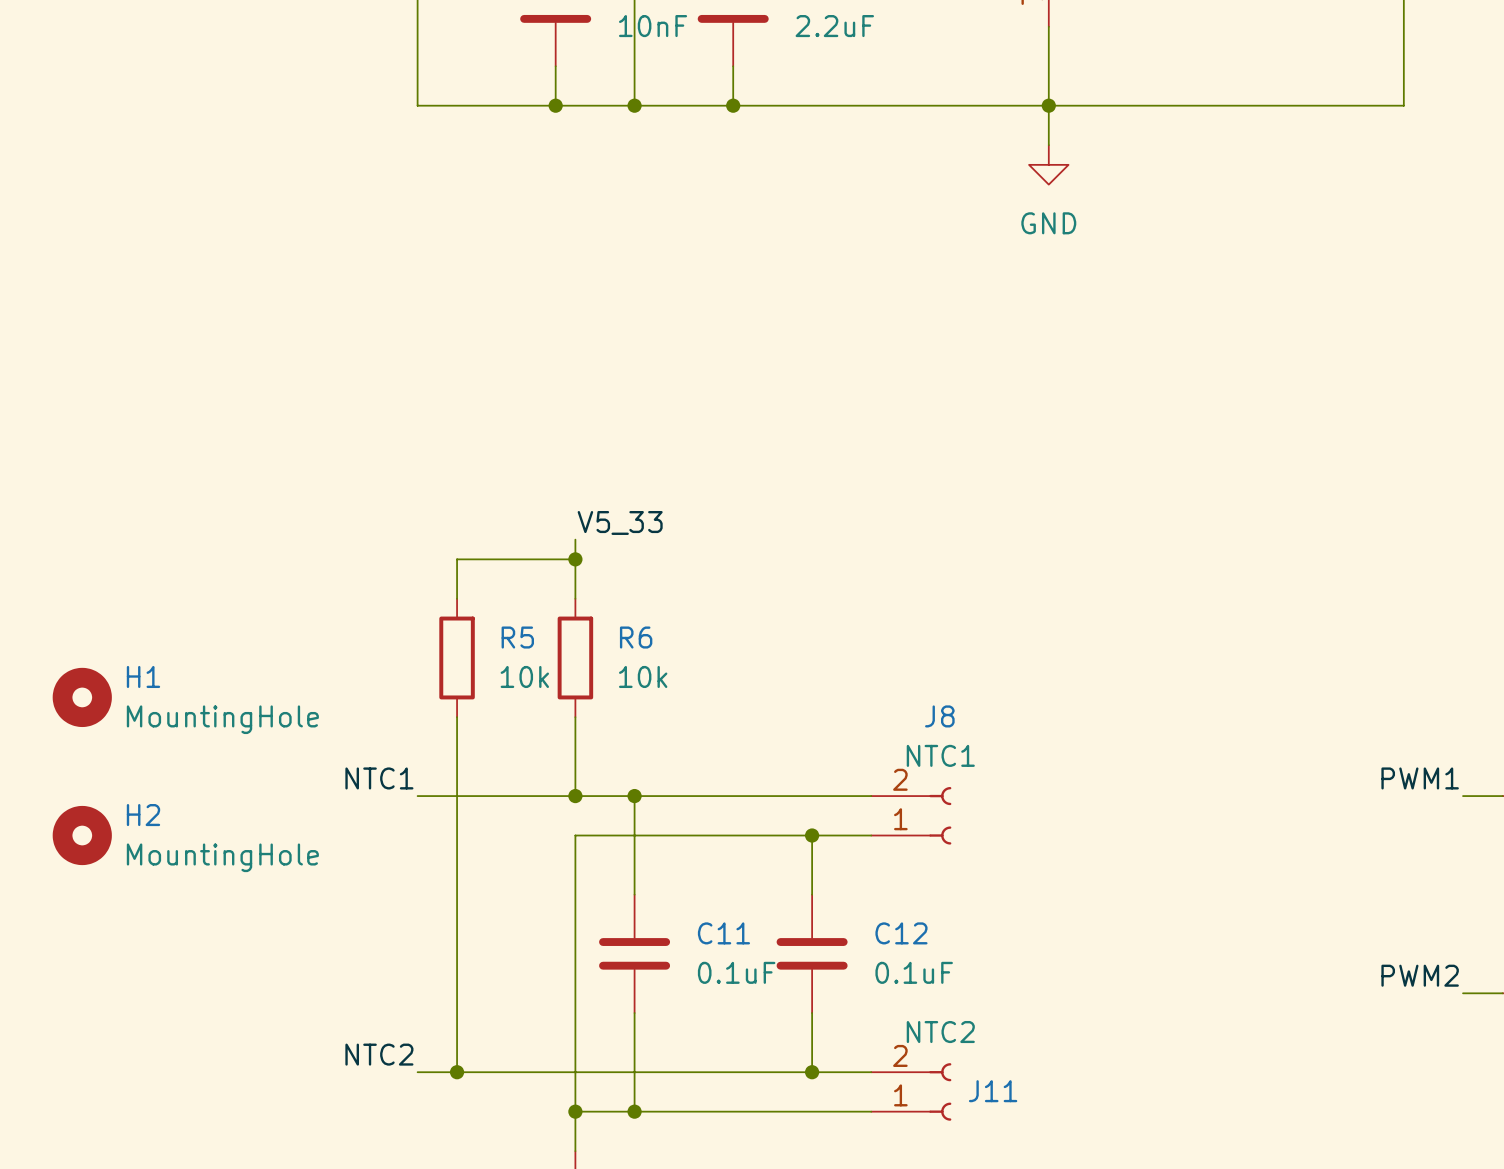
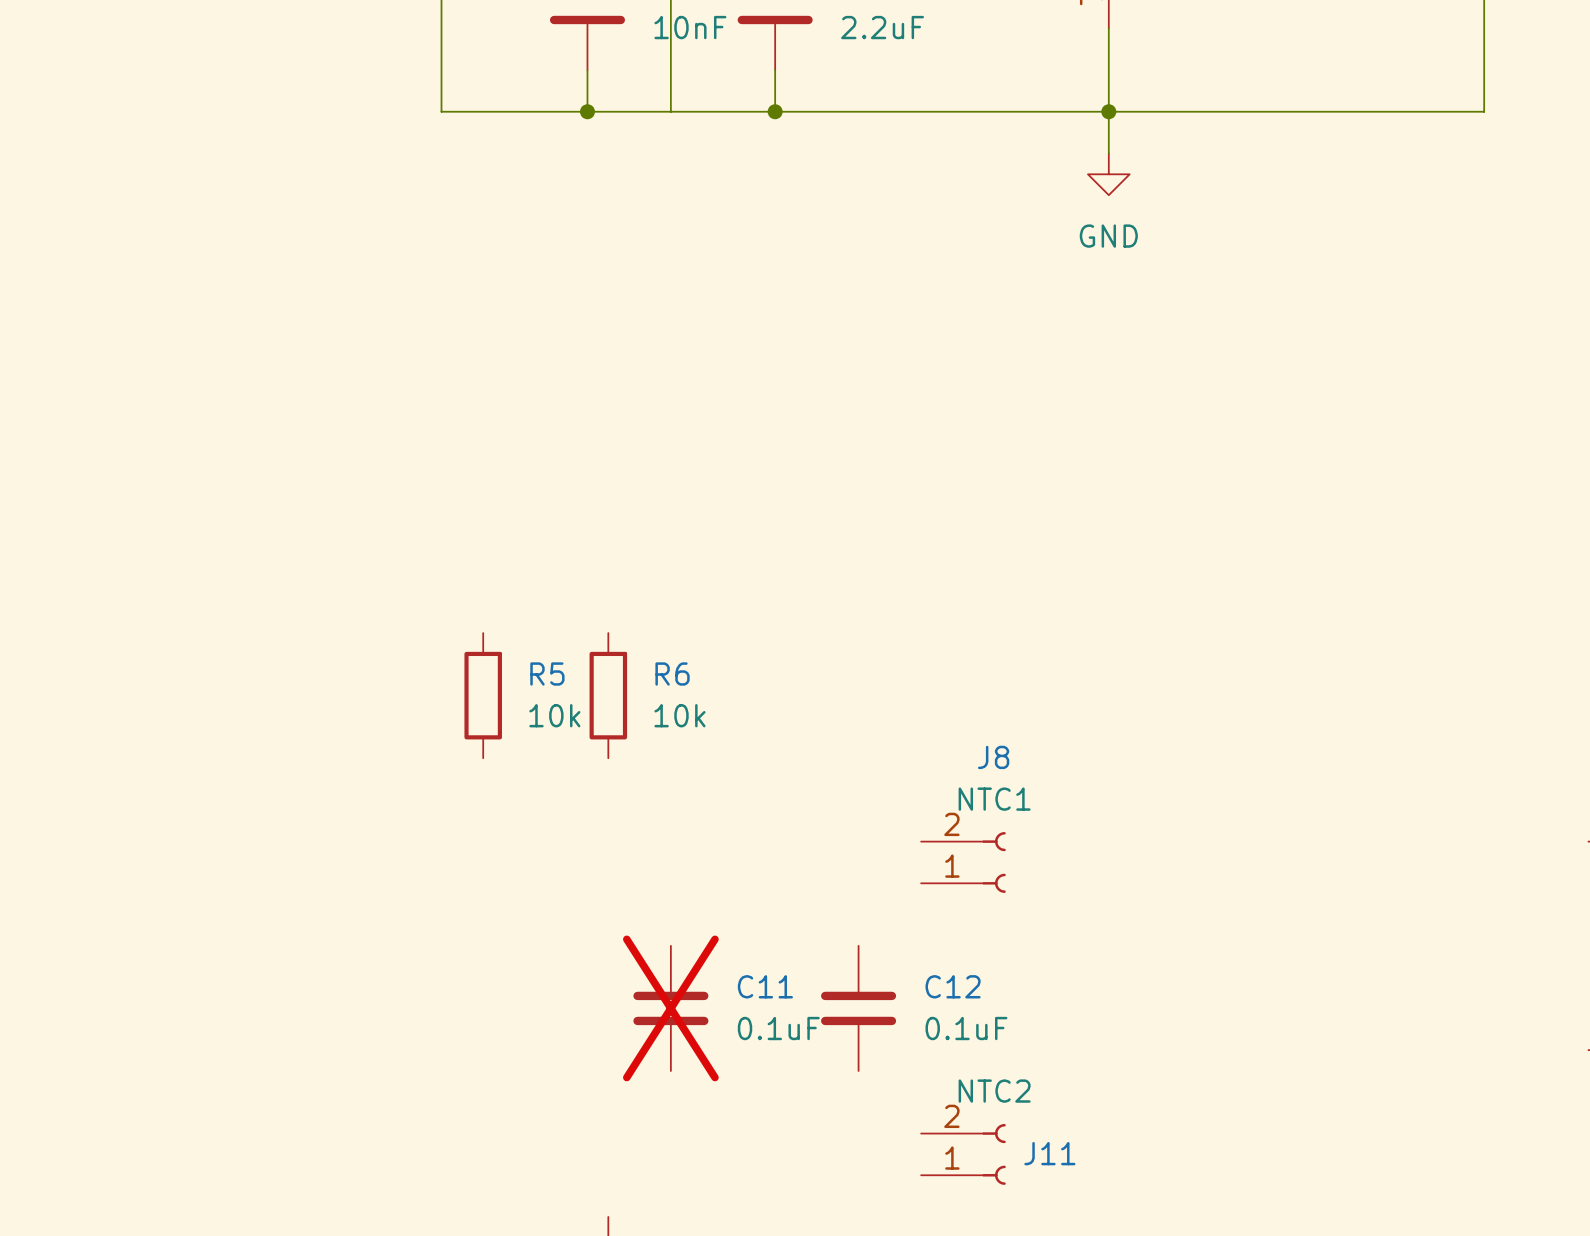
junction: (634, 105) -> none
label: V5_33 (620, 522) -> none
wire: (575, 539) (575, 598) -> none
wire: (575, 559) (457, 559) (457, 598) -> none
junction: (575, 559) -> none
H1: MountingHole (82, 697) -> none
wire: (457, 717) (457, 1072) -> none
wire: (575, 717) (575, 796) -> none
label: NTC1 (379, 778) -> none
label: PWM1 (1420, 778) -> none
wire: (417, 796) (871, 796) -> none
junction: (575, 796) -> none
wire: (634, 796) (634, 894) -> none
junction: (634, 796) -> none
wire: (1463, 796) (1502, 796) -> none
H2: MountingHole (82, 835) -> none
wire: (812, 835) (812, 894) -> none
junction: (812, 835) -> none
wire: (871, 835) (575, 835) (575, 1151) -> none
C11 do-not-place cross: none -> (670, 1008)
label: PWM2 (1420, 975) -> none
wire: (1463, 993) (1502, 993) -> none
wire: (634, 1013) (634, 1111) -> none
wire: (812, 1013) (812, 1072) -> none
label: NTC2 (379, 1054) -> none
wire: (417, 1072) (871, 1072) -> none
junction: (457, 1072) -> none
junction: (812, 1072) -> none
wire: (575, 1111) (871, 1111) -> none
junction: (575, 1111) -> none
junction: (634, 1111) -> none

